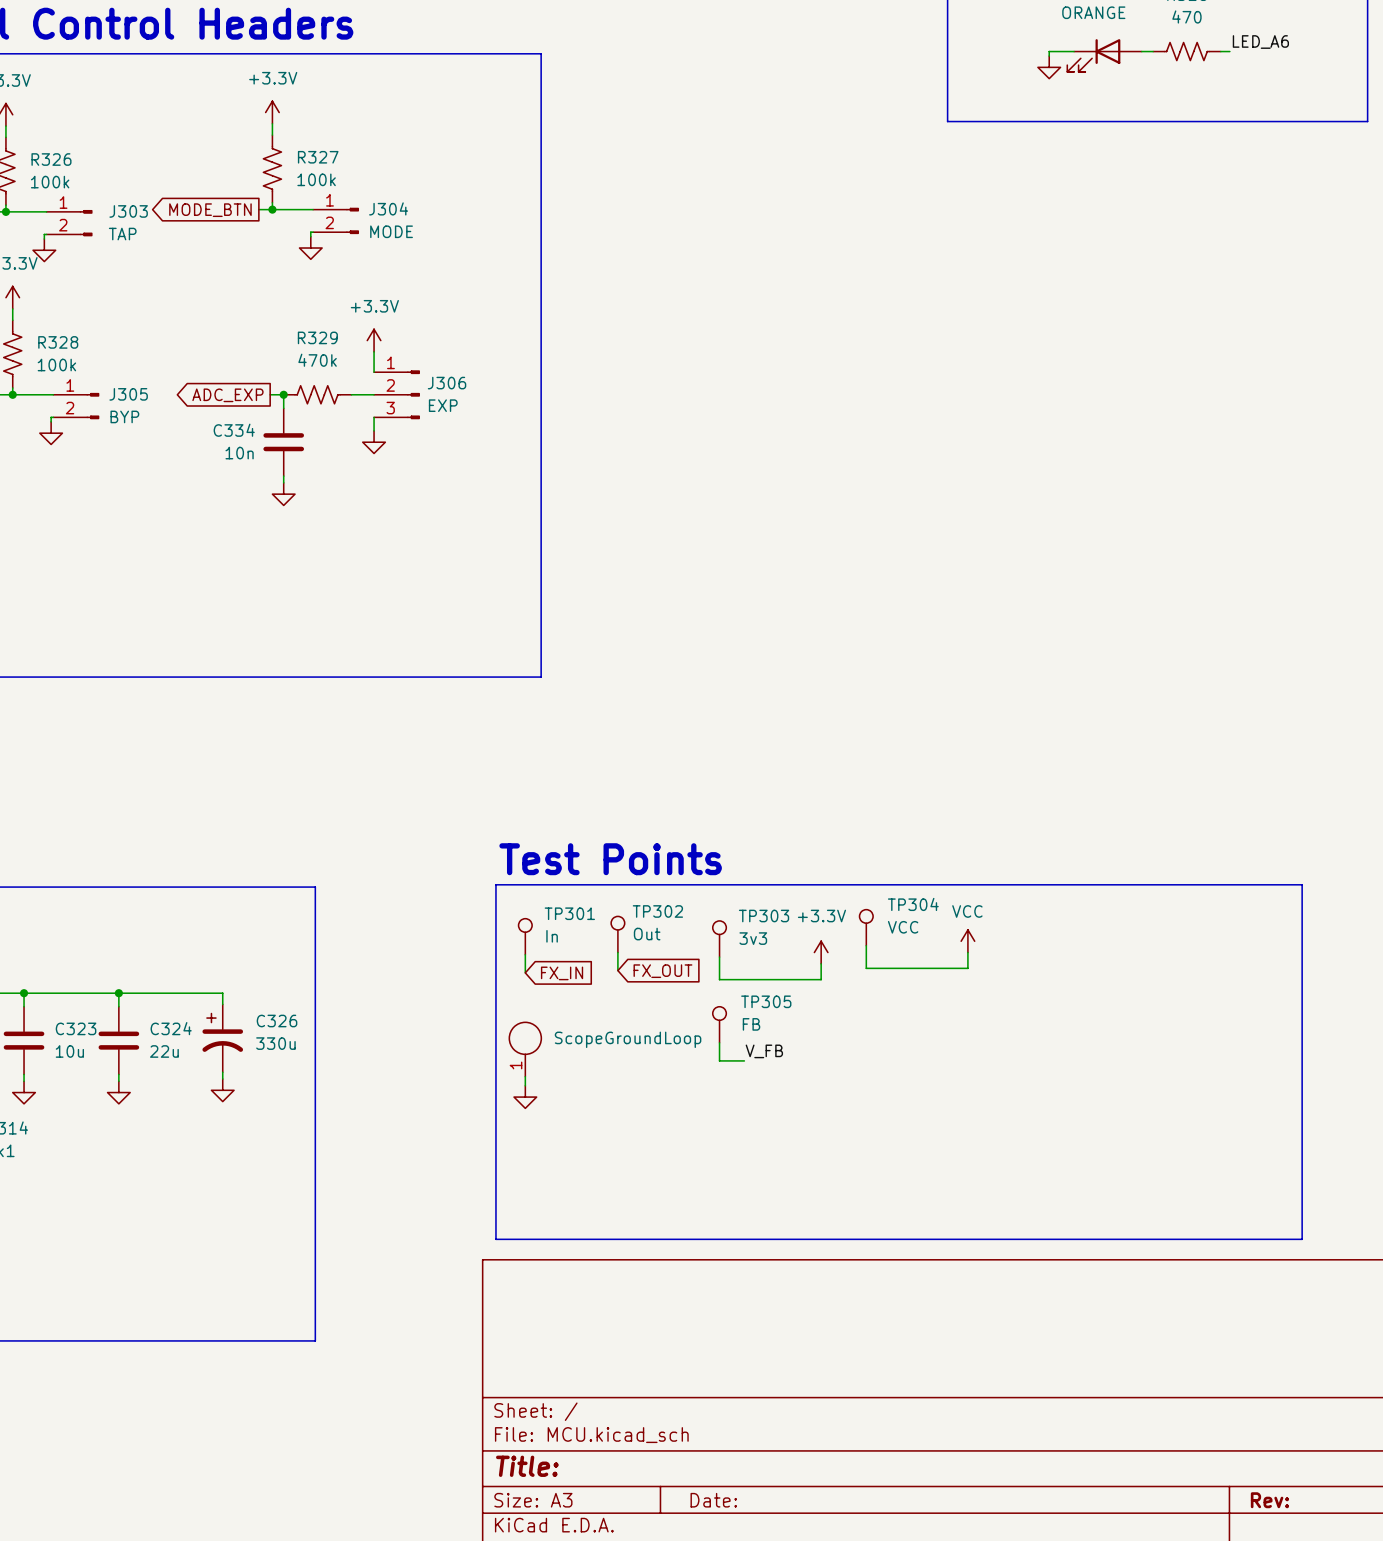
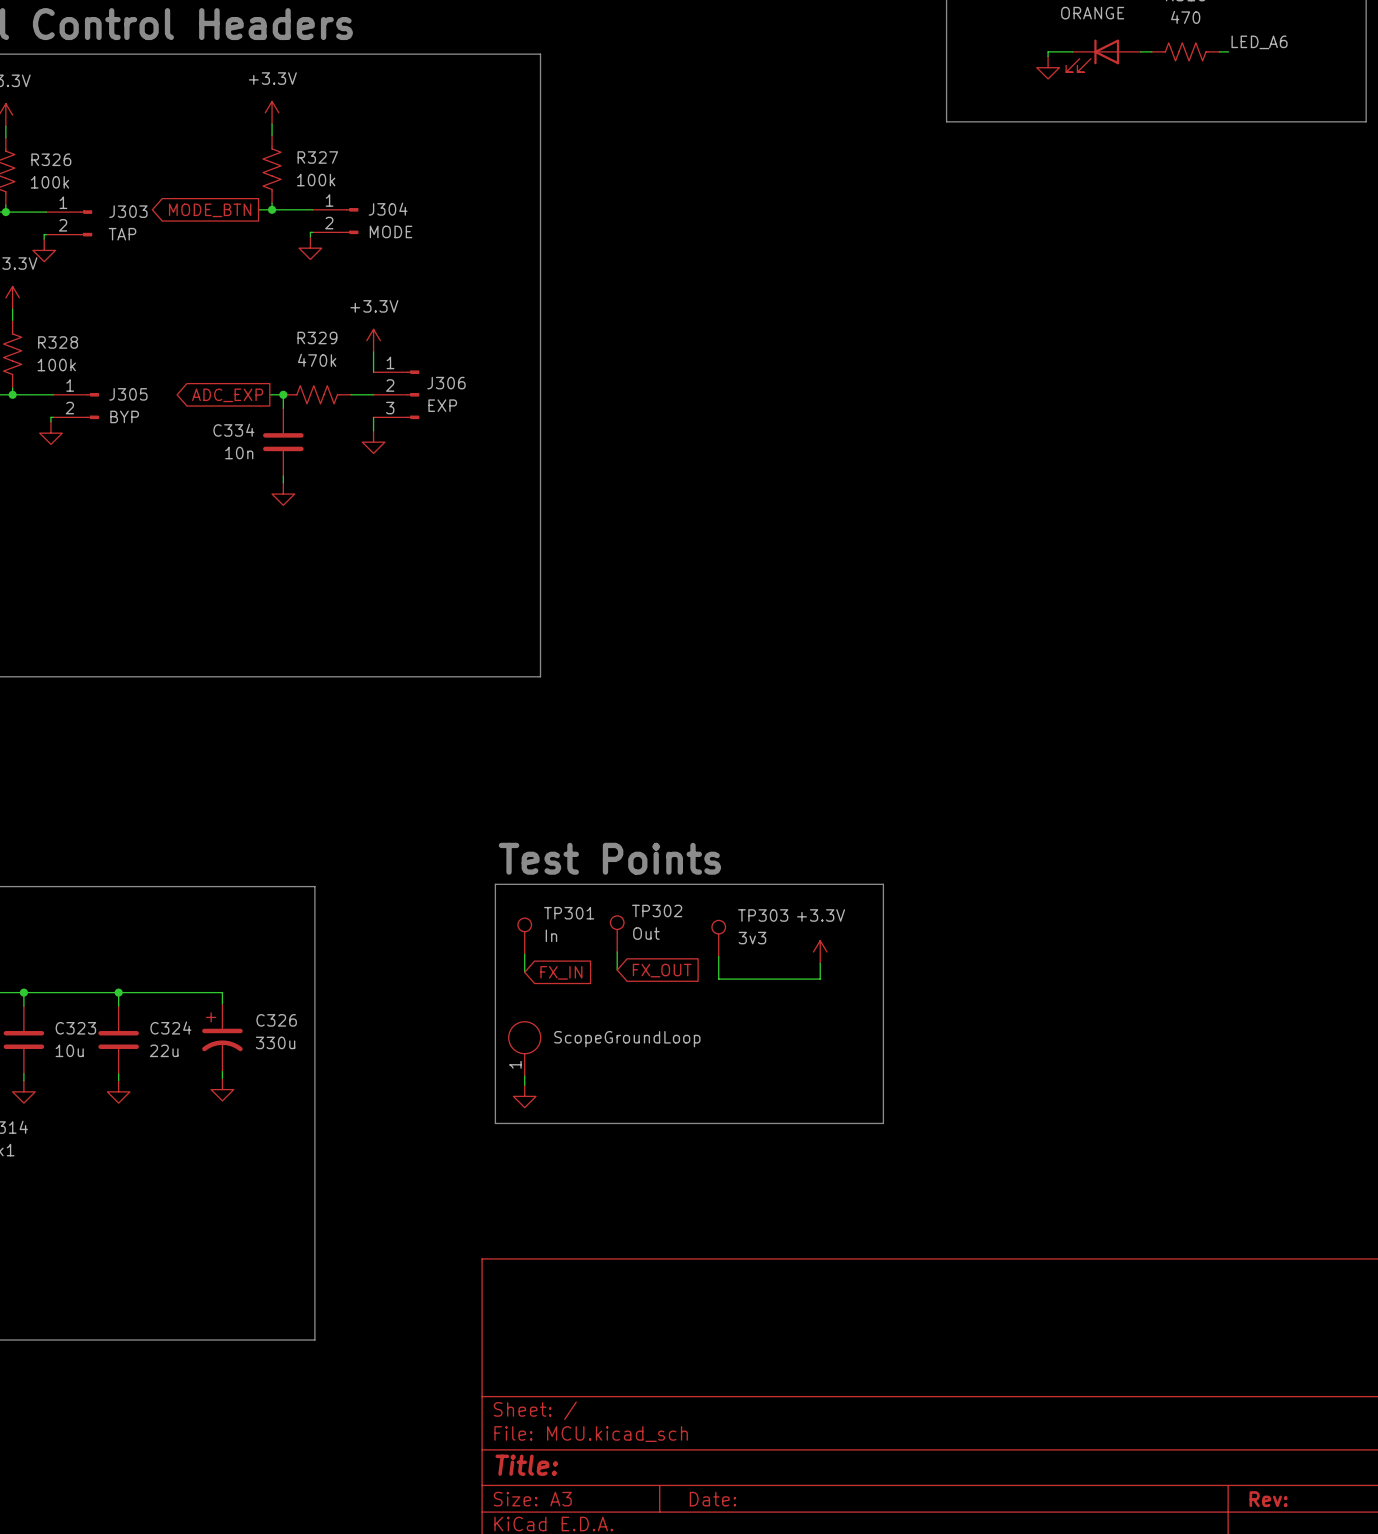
line: (884, 884) (1302, 884) (1302, 1239) (495, 1239) (495, 1124) -> (883, 884) (883, 1123) (495, 1123)
TP304: VCC (866, 927) -> none
power symbol: VCC (967, 941) -> none
wire: (866, 945) (866, 968) (967, 968) (967, 952) -> none
TP305: FB (719, 1024) -> none
wire: (719, 1042) (719, 1060) (744, 1060) -> none
label: V_FB (764, 1051) -> none

